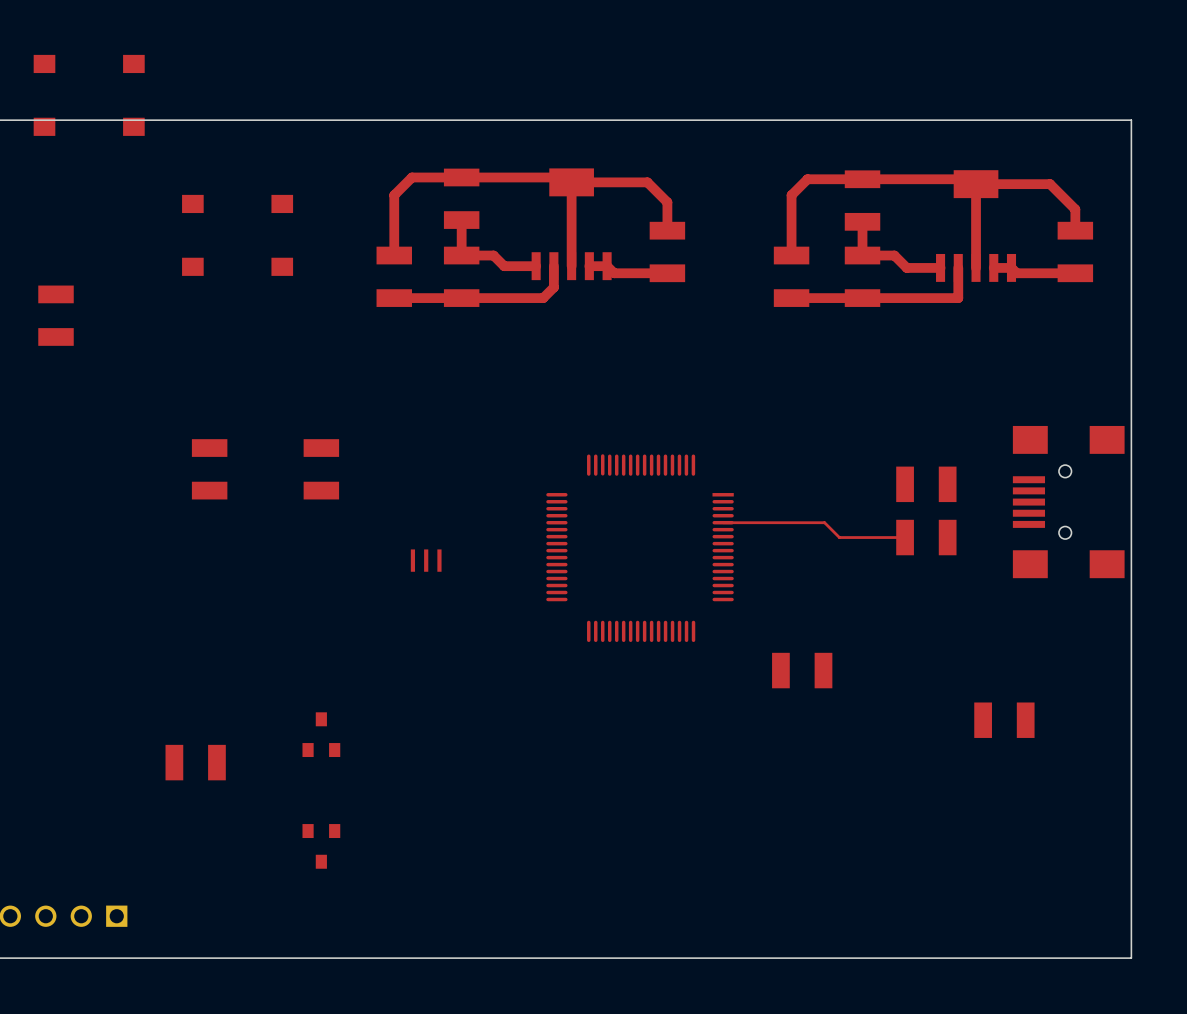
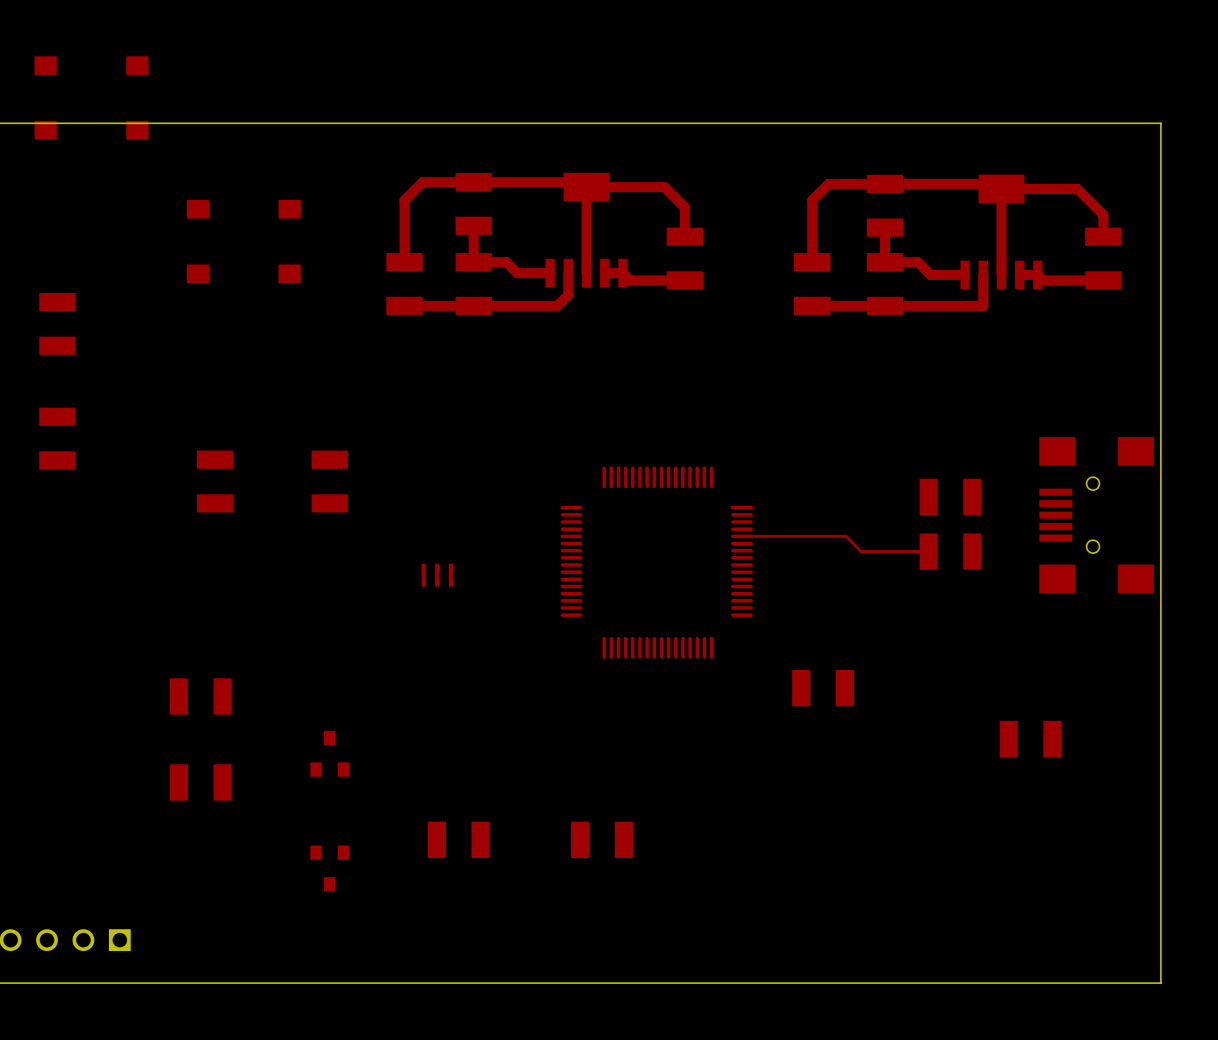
part: none -> (57, 438)
part: none -> (200, 696)
part: none -> (458, 839)
part: none -> (602, 839)

